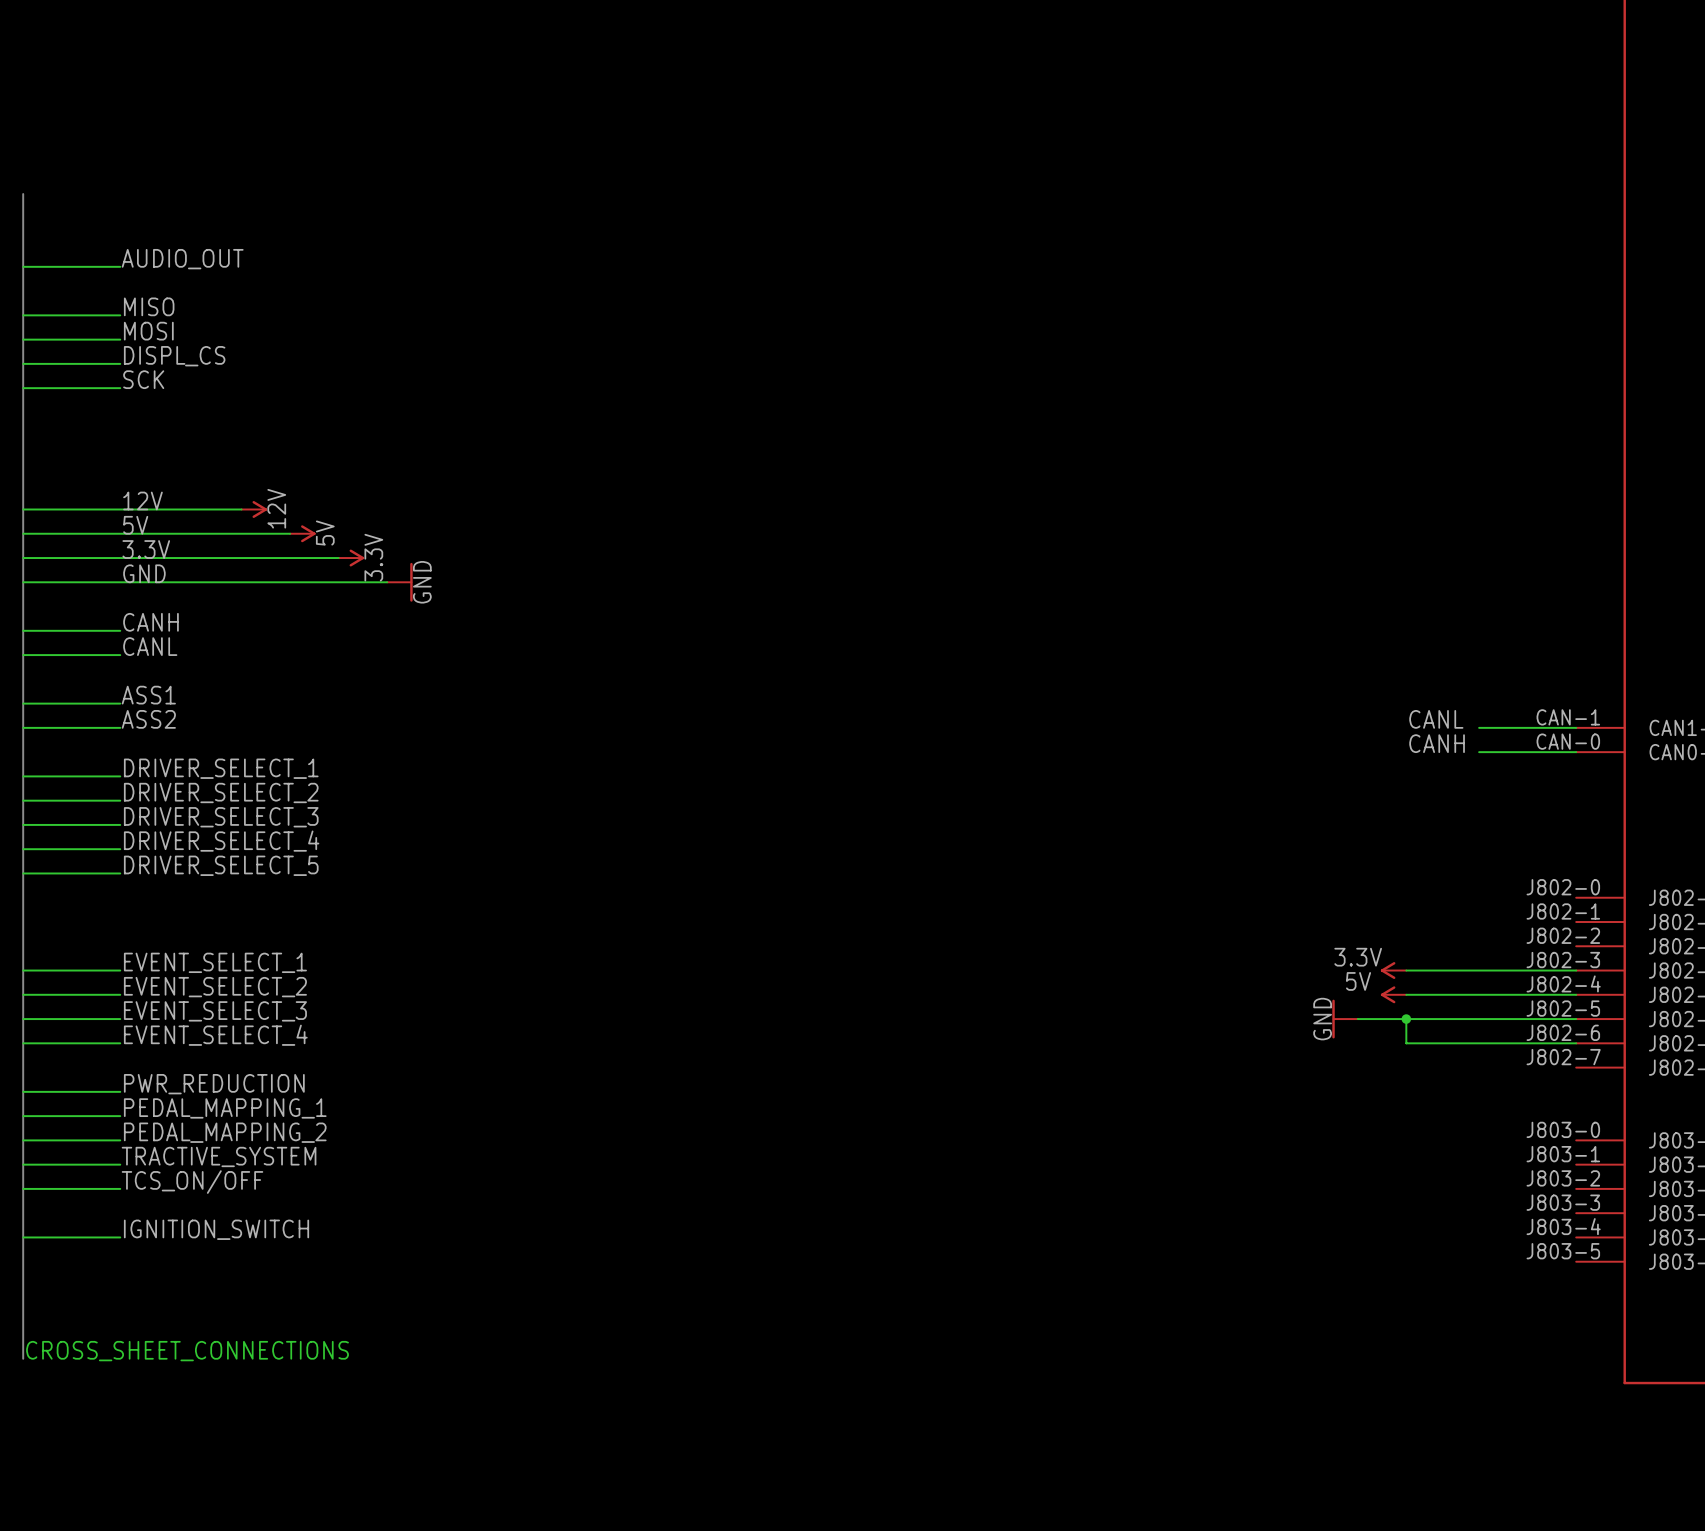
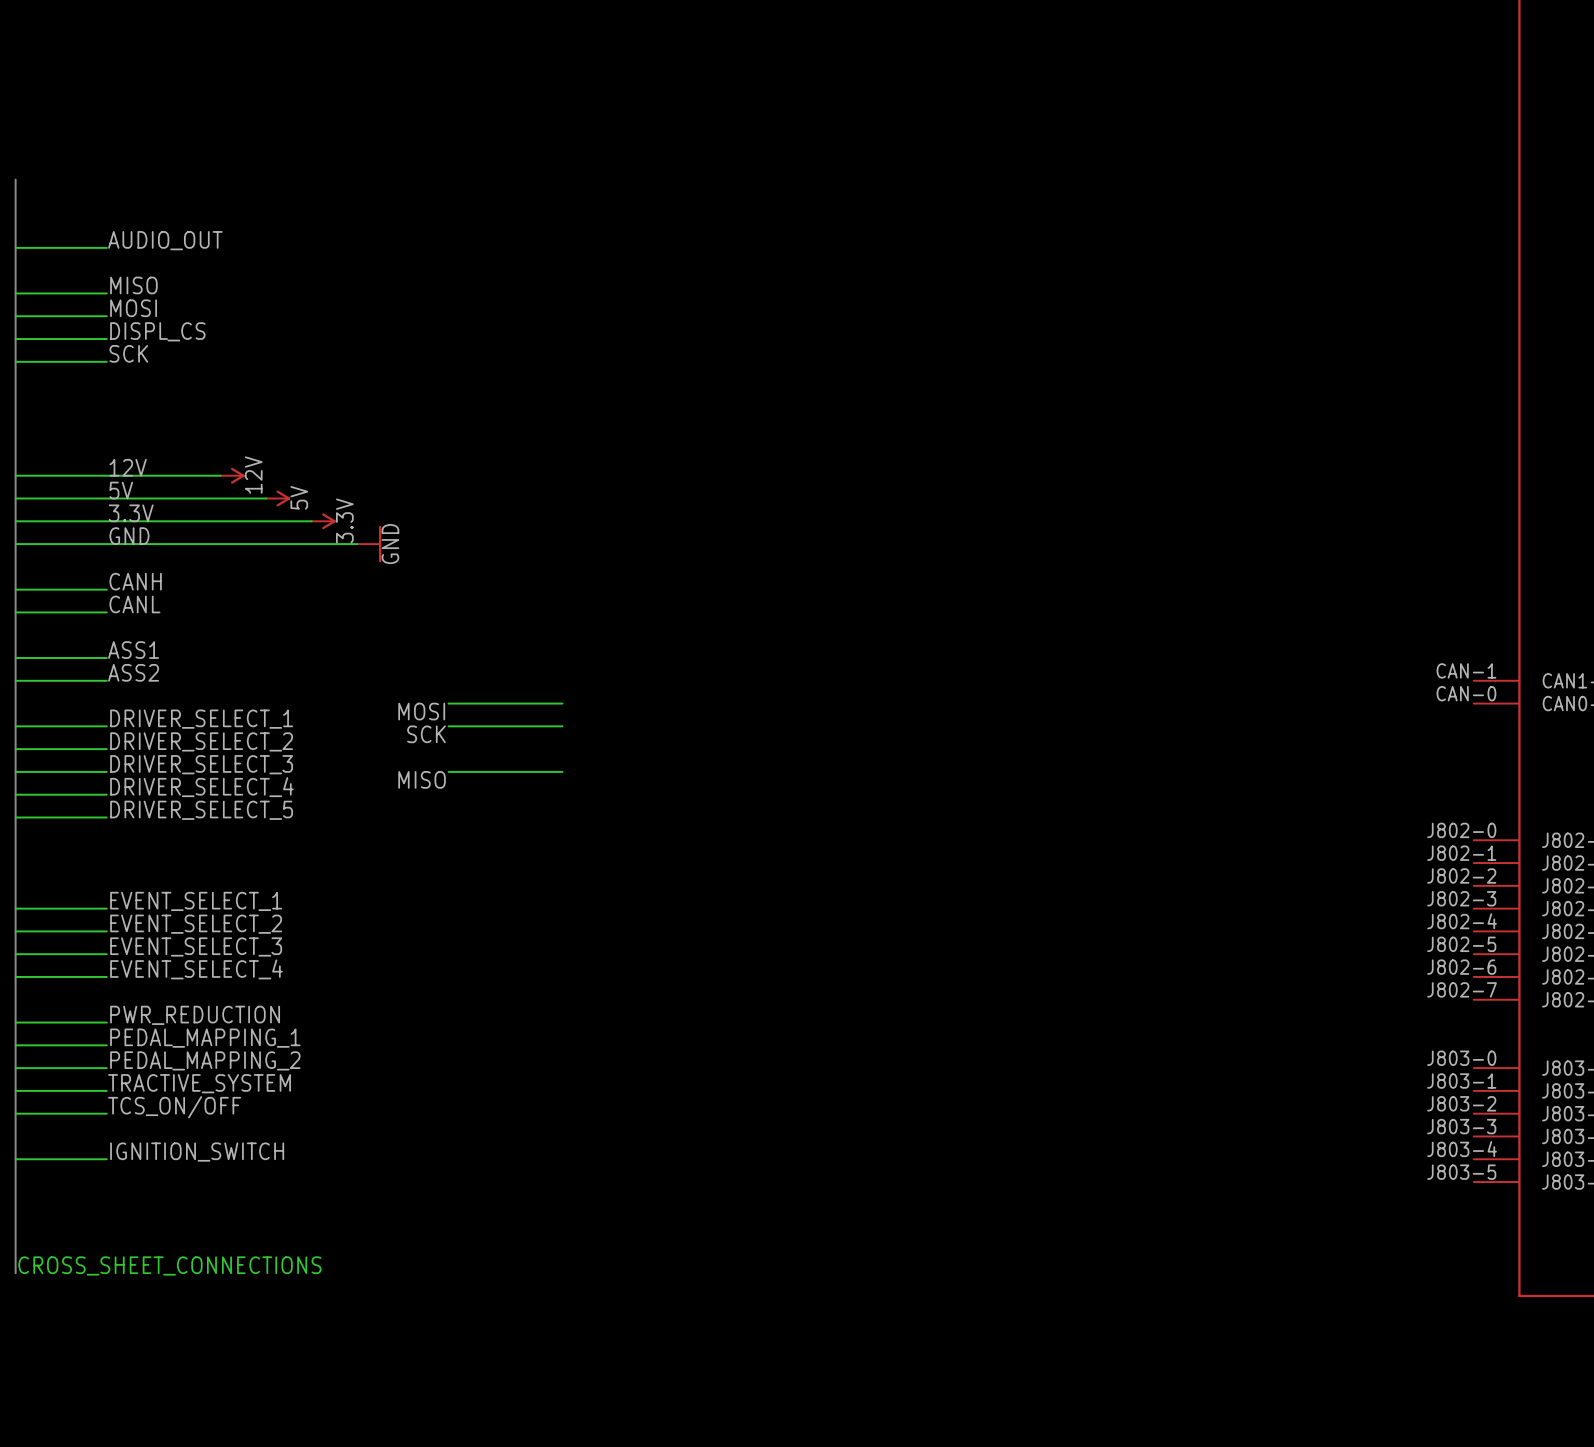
label: CANL (1436, 719) -> none
wire: (1479, 727) (1576, 727) -> none
label: CANH (1437, 743) -> none
wire: none -> (448, 703) (562, 703)
wire: (1479, 752) (1576, 752) -> none
label: none -> MOSI (421, 711)
wire: none -> (448, 726) (562, 726)
label: none -> SCK (426, 734)
wire: none -> (448, 771) (562, 771)
label: none -> MISO (422, 779)
power symbol: 3.3V (1393, 970) -> none
wire: (1406, 970) (1576, 970) -> none
power symbol: 5V (1393, 994) -> none
wire: (1406, 994) (1576, 994) -> none
power symbol: GND (1345, 1019) -> none
wire: (1357, 1019) (1576, 1019) -> none
wire: (1406, 1019) (1406, 1043) (1576, 1043) -> none
junction: (1406, 1019) -> none

